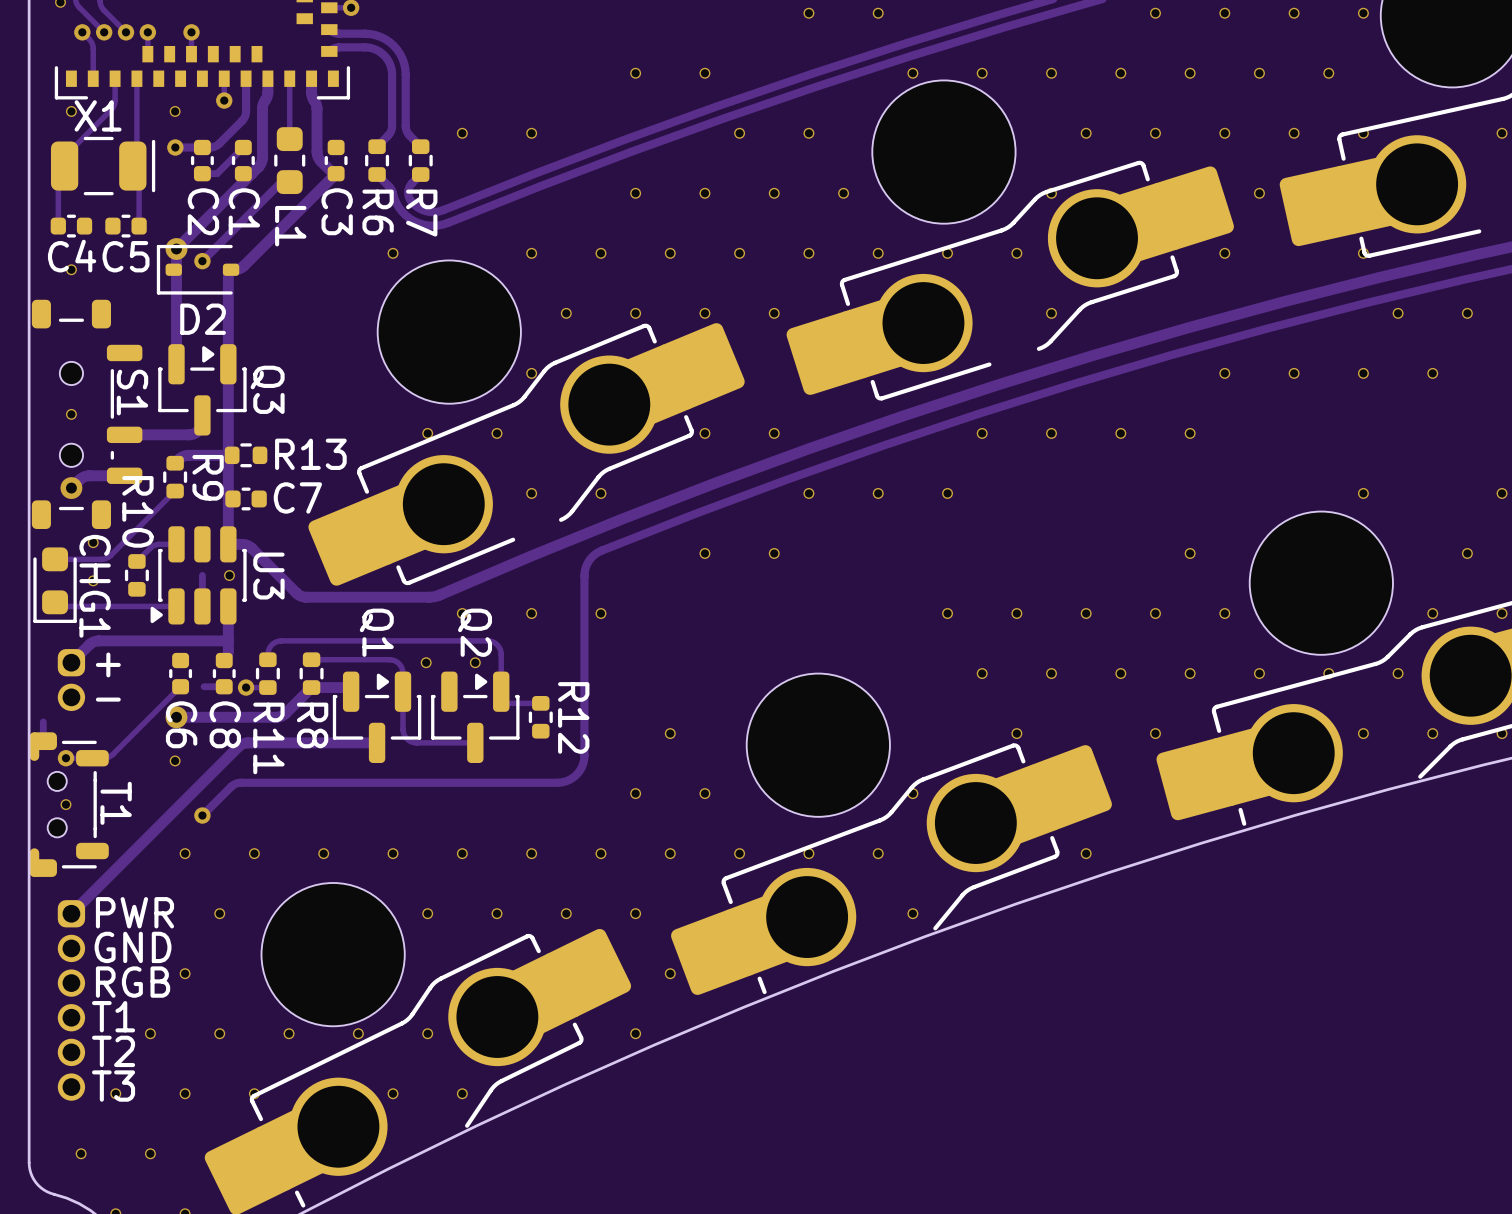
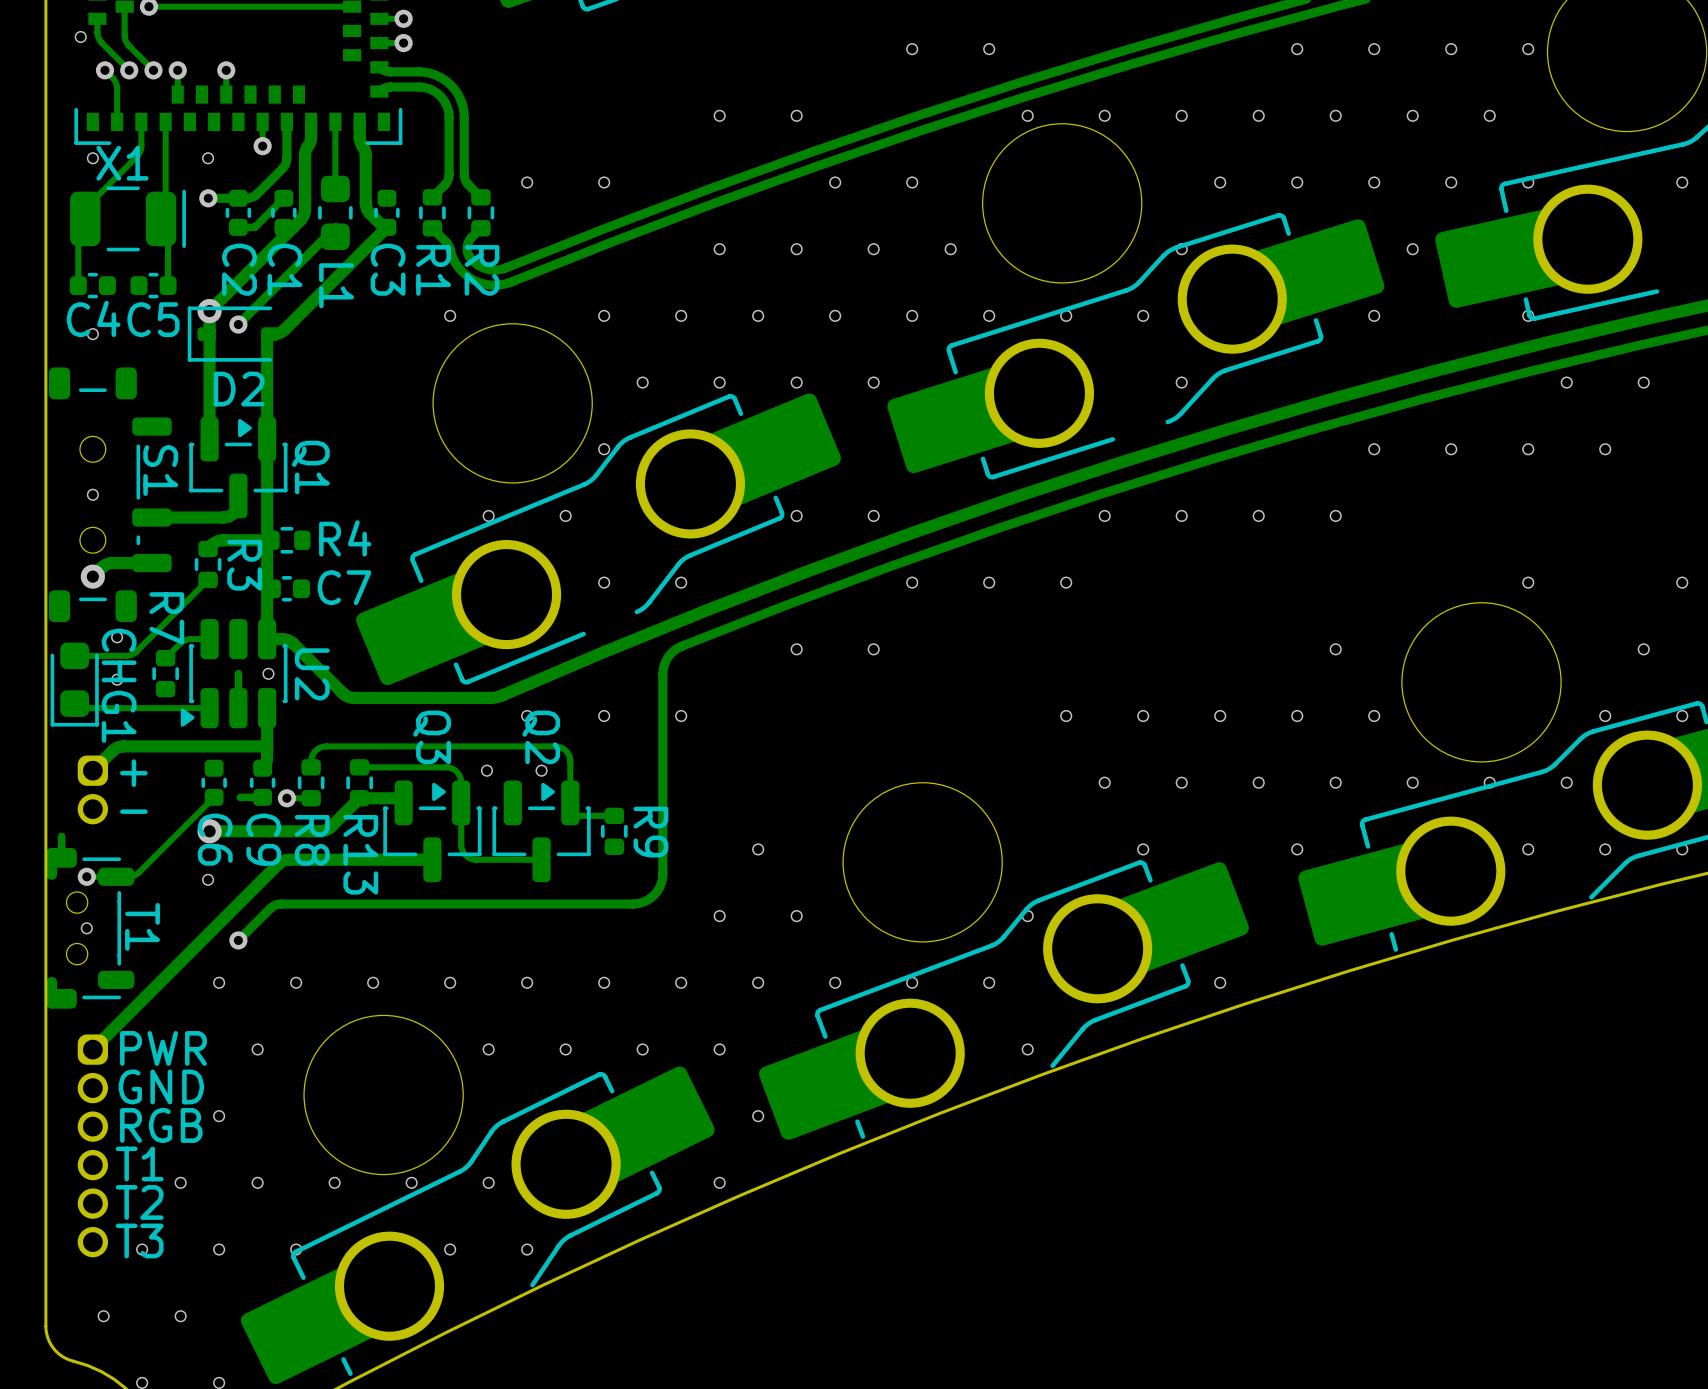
R6 name: R6 (378, 212) -> R1 (433, 270)
R7 name: R7 (421, 213) -> R2 (482, 270)
Q3 name: Q3 (267, 389) -> Q1 (310, 467)
R13 name: R13 (310, 454) -> R4 (345, 538)
R9 name: R9 (208, 477) -> R3 (244, 565)
R10 name: R10 (137, 511) -> R7 (166, 618)
U3 name: U3 (268, 576) -> U2 (312, 674)
Q1 name: Q1 (376, 632) -> Q3 (432, 737)
R12 name: R12 (573, 717) -> R9 (650, 832)
C8 name: C8 (225, 724) -> C9 (263, 839)
R8 name: R8 (312, 725) -> R13 (360, 854)
R11 name: R11 (268, 738) -> R8 (312, 840)

